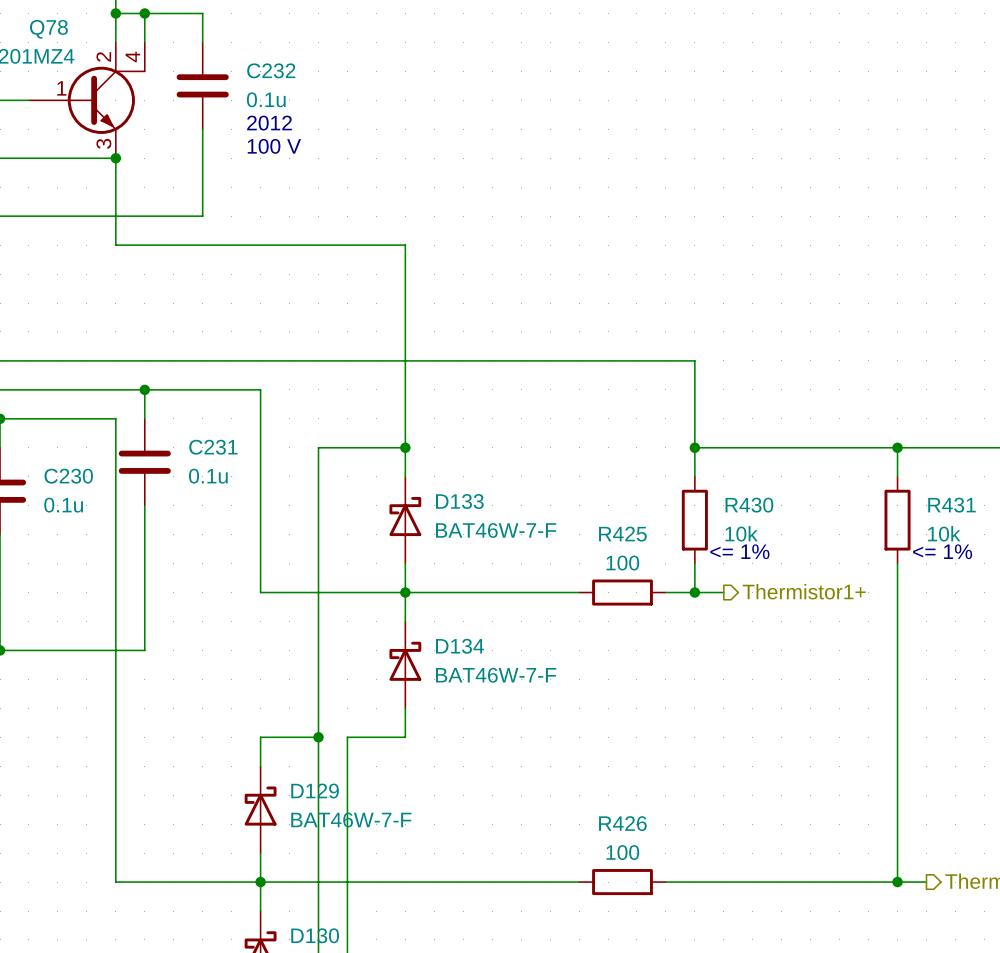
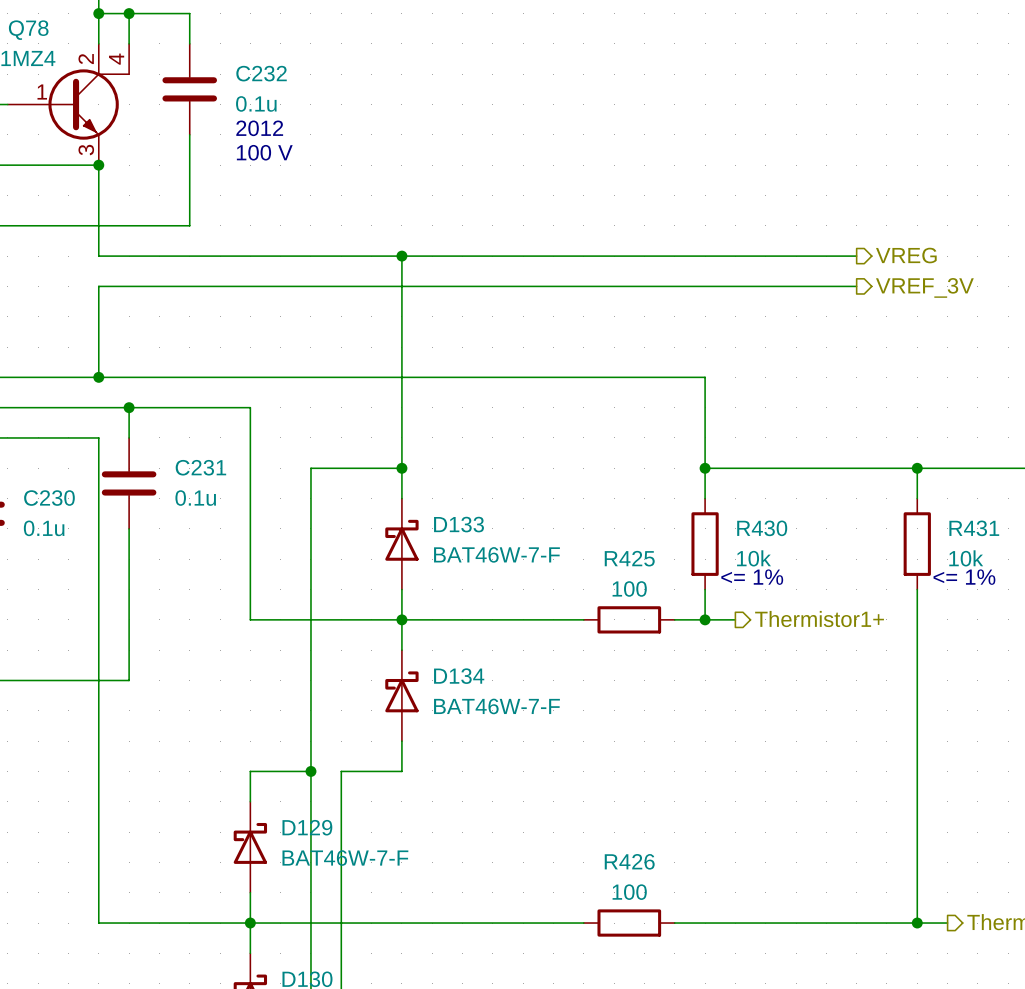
hierarchical label: none -> VREG (906, 255)
wire: none -> (401, 256) (856, 256)
junction: none -> (401, 256)
wire: none -> (856, 286) (98, 286) (98, 377)
hierarchical label: none -> VREF_3V (924, 287)
junction: none -> (98, 377)

